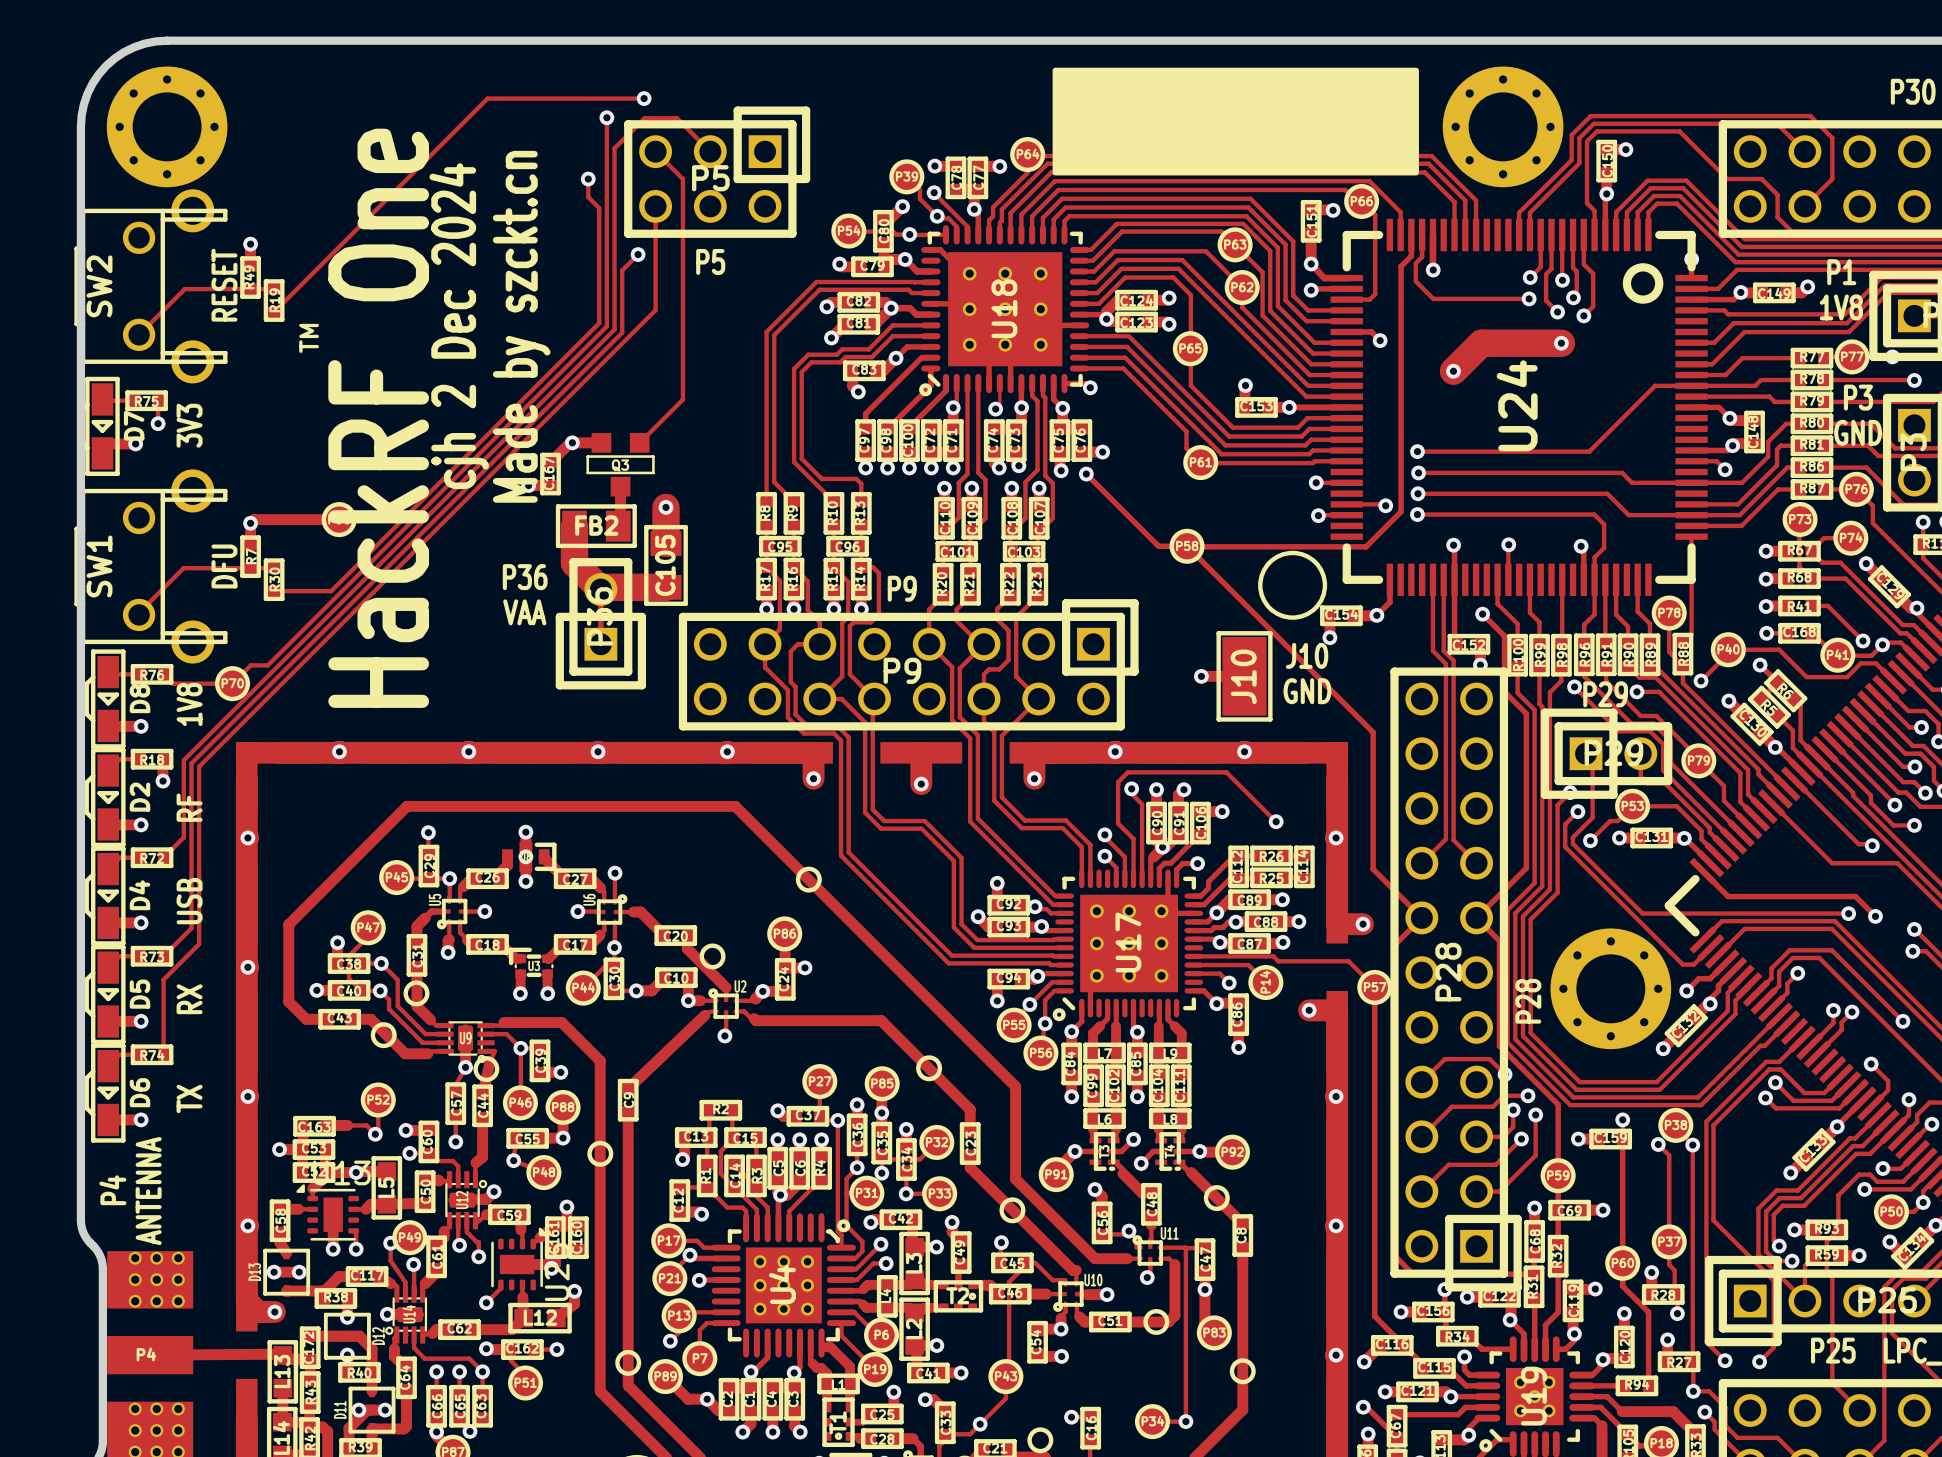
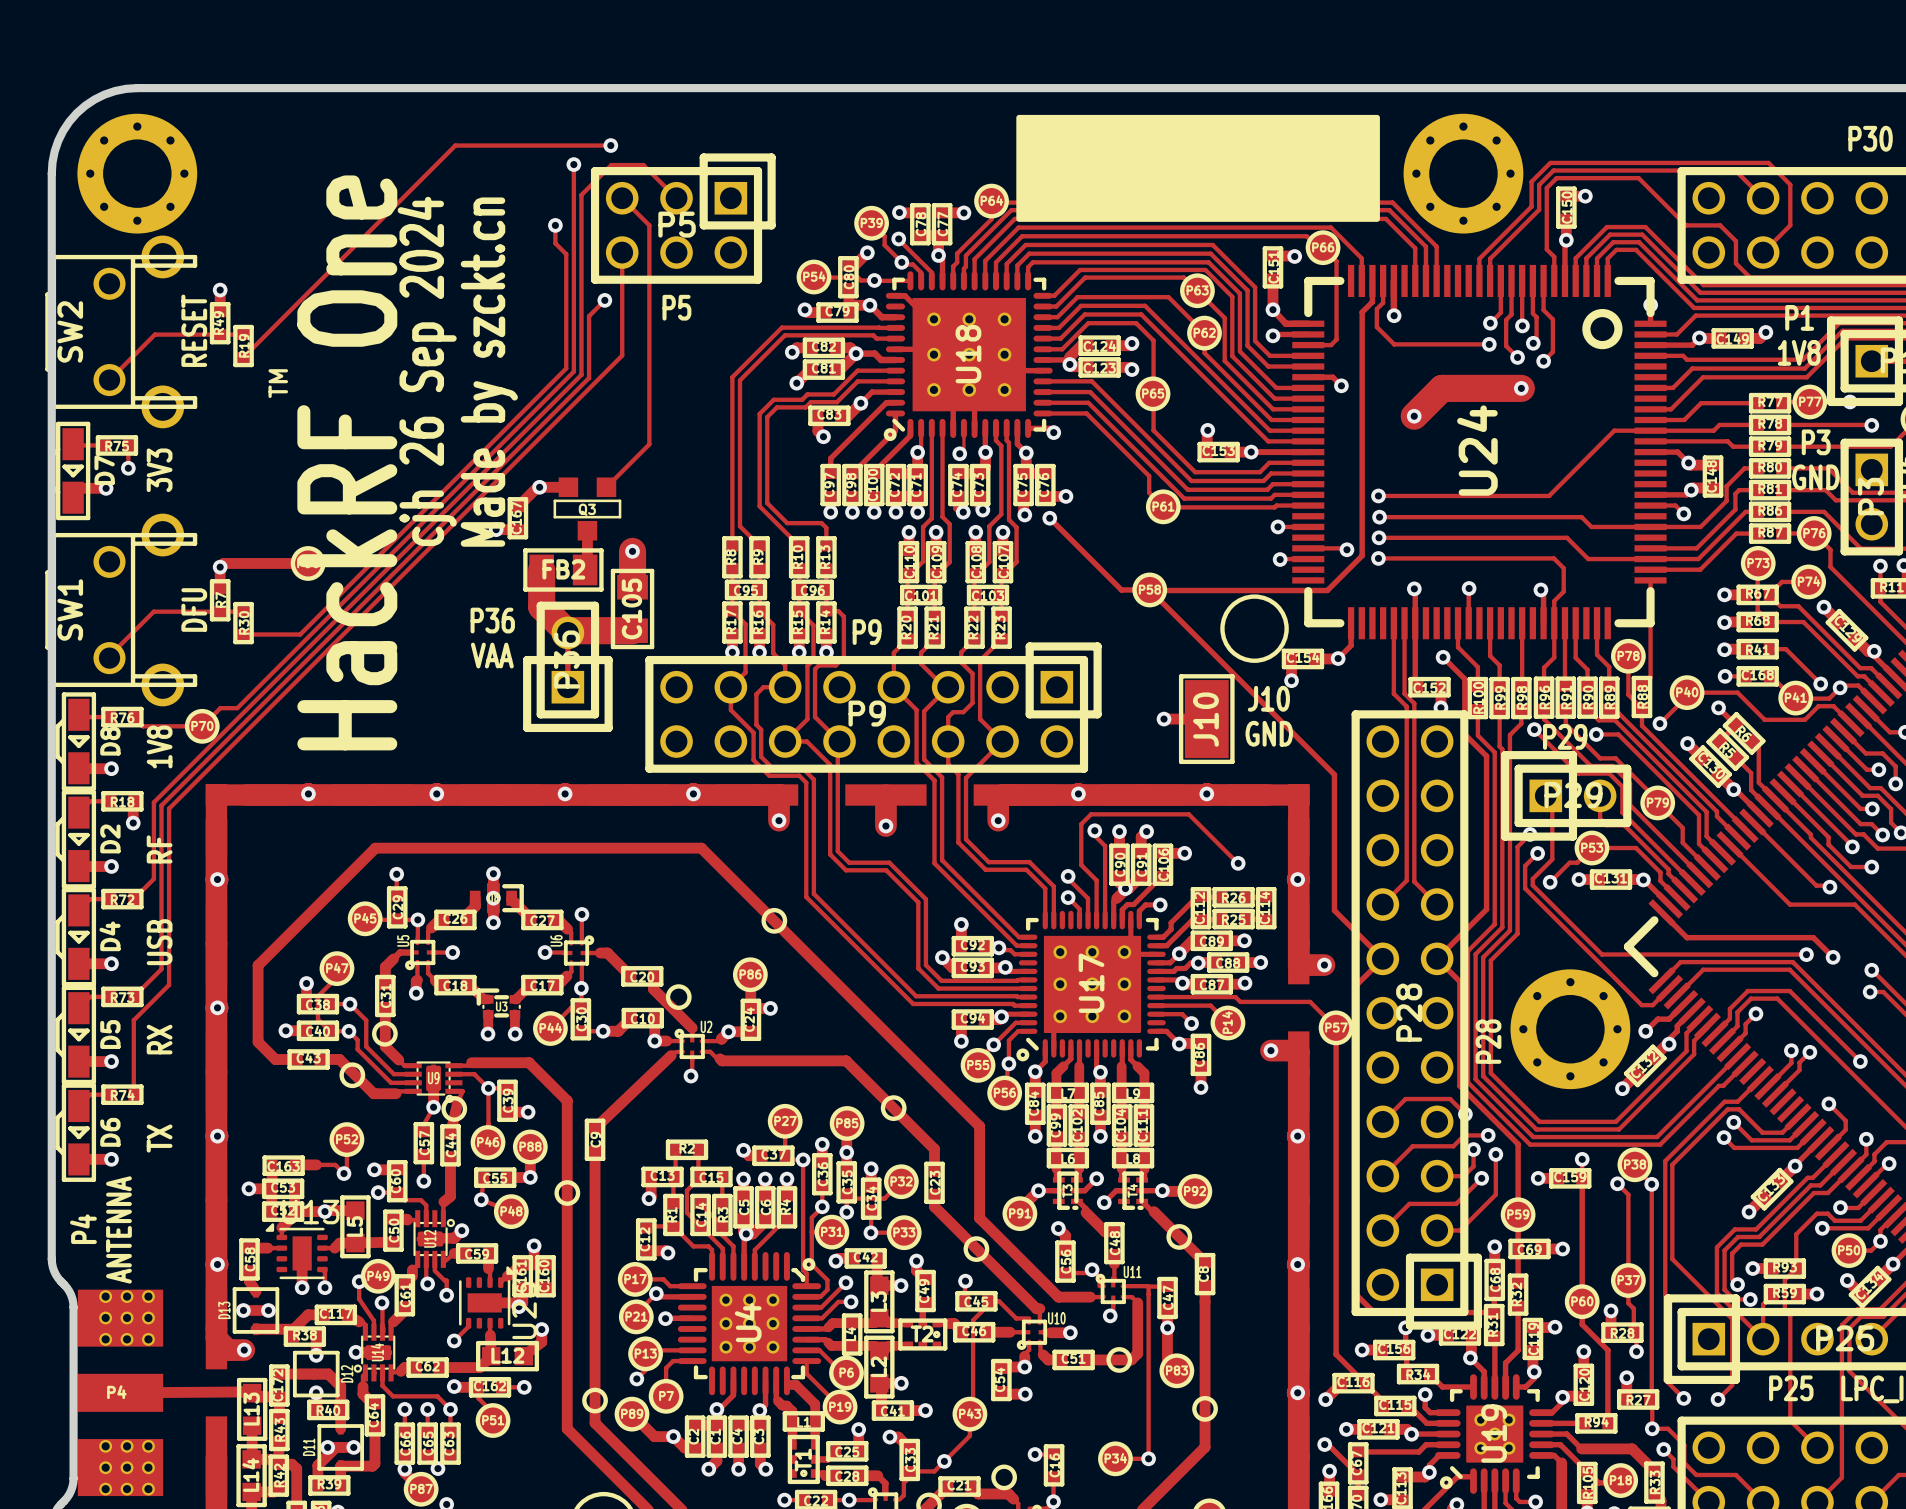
text: cjh 2 Dec 2024 (459, 326) -> cjh 26 Sep 2024 (427, 371)

